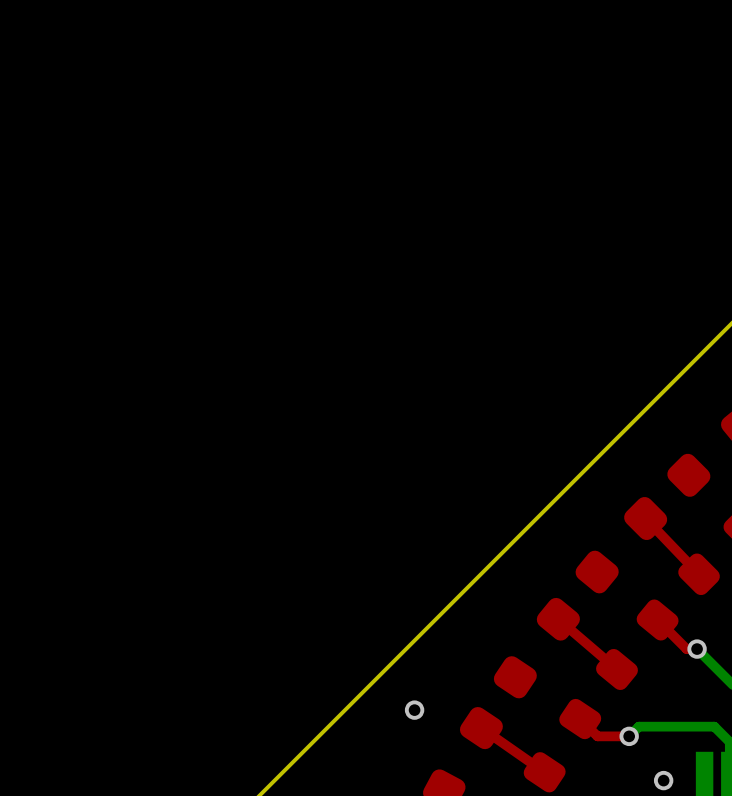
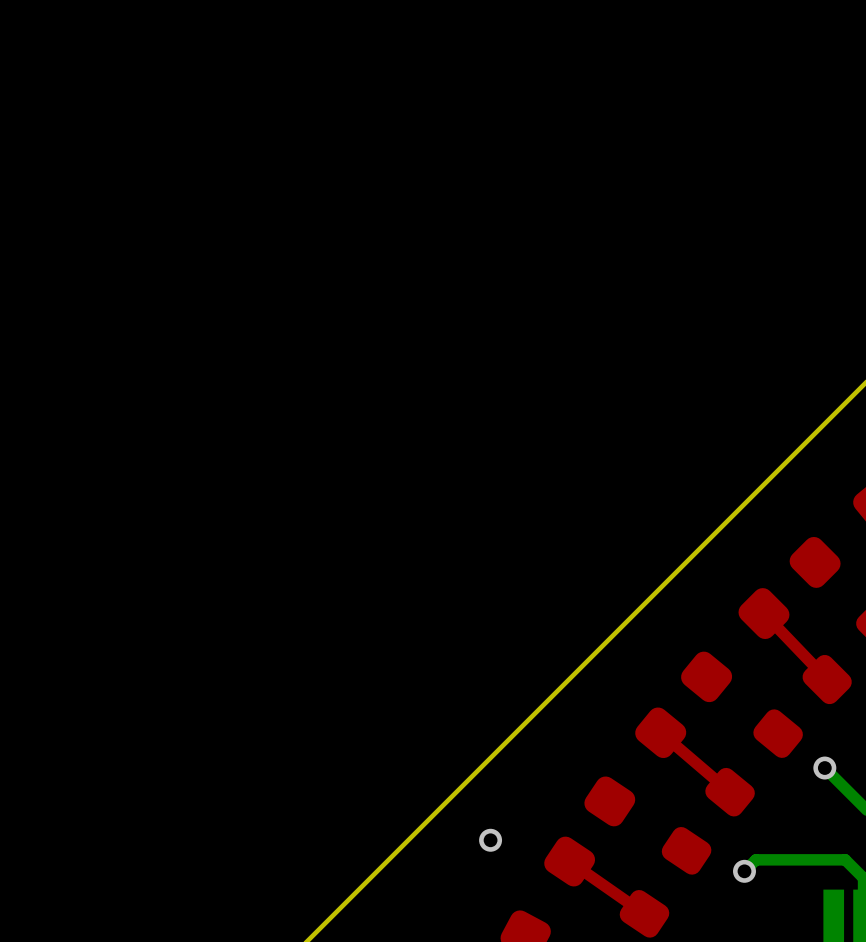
top track: (657, 620) (686, 649) (697, 649) -> none
top track: (580, 719) (597, 736) (629, 736) -> none
via: (663, 780) -> none

